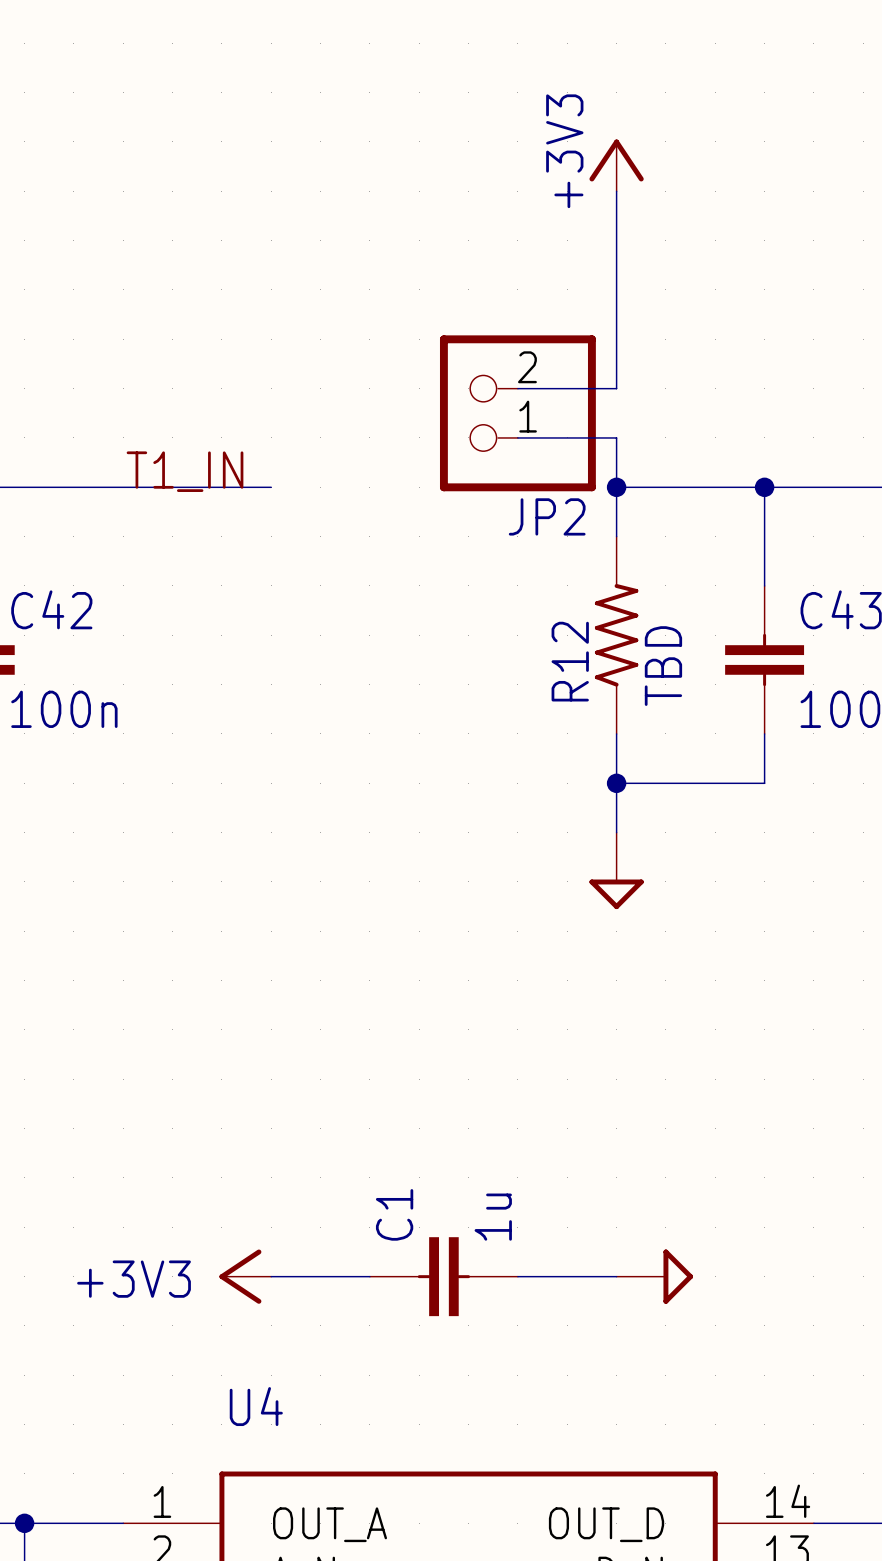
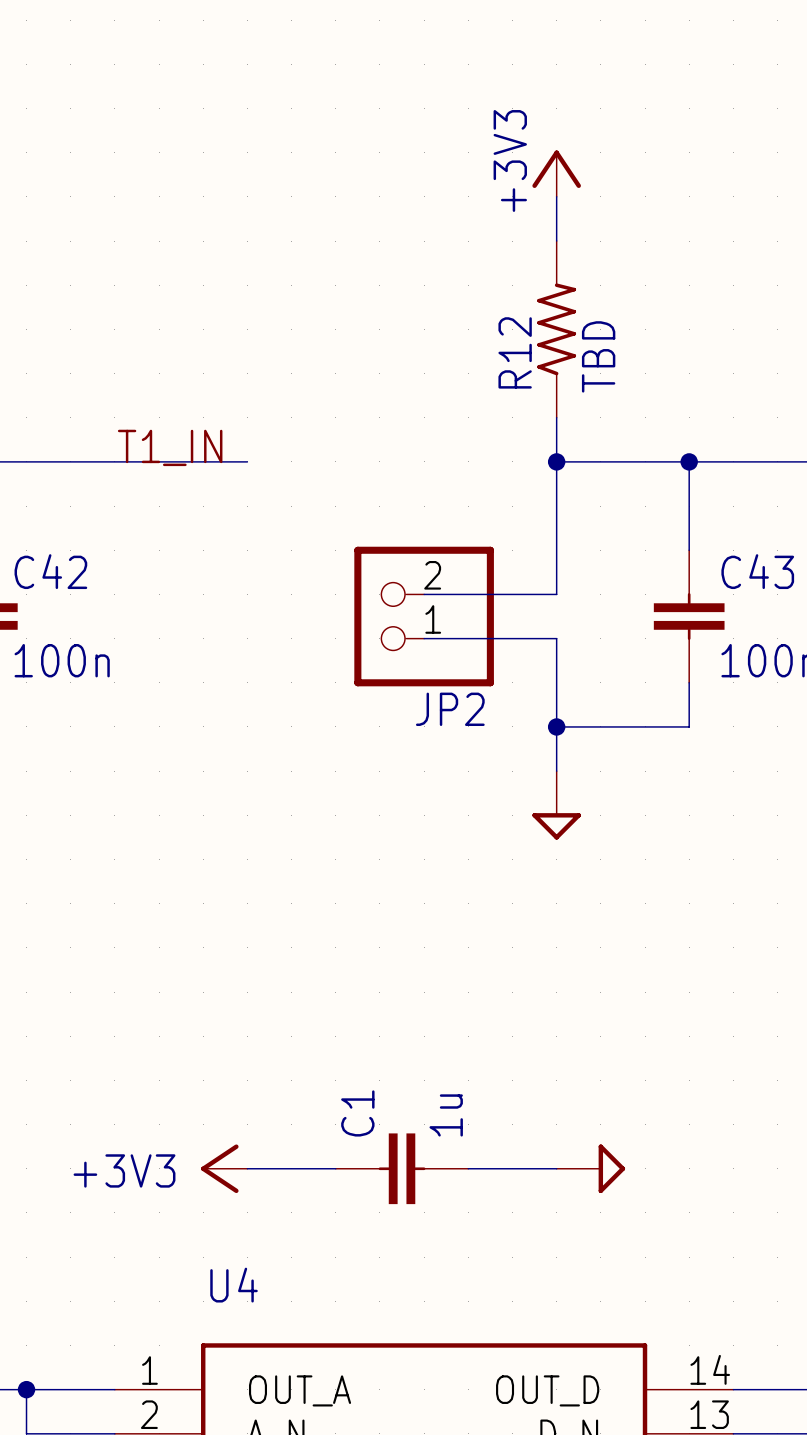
wire: (616, 240) (616, 388) (517, 388) -> none
JP2 position: (517, 413) -> (424, 616)
wire: (517, 437) (616, 437) -> none
wire: none -> (556, 506) (556, 594) (424, 594)
R12 position: (616, 635) -> (556, 329)
wire: none -> (424, 638) (556, 638) (556, 682)

